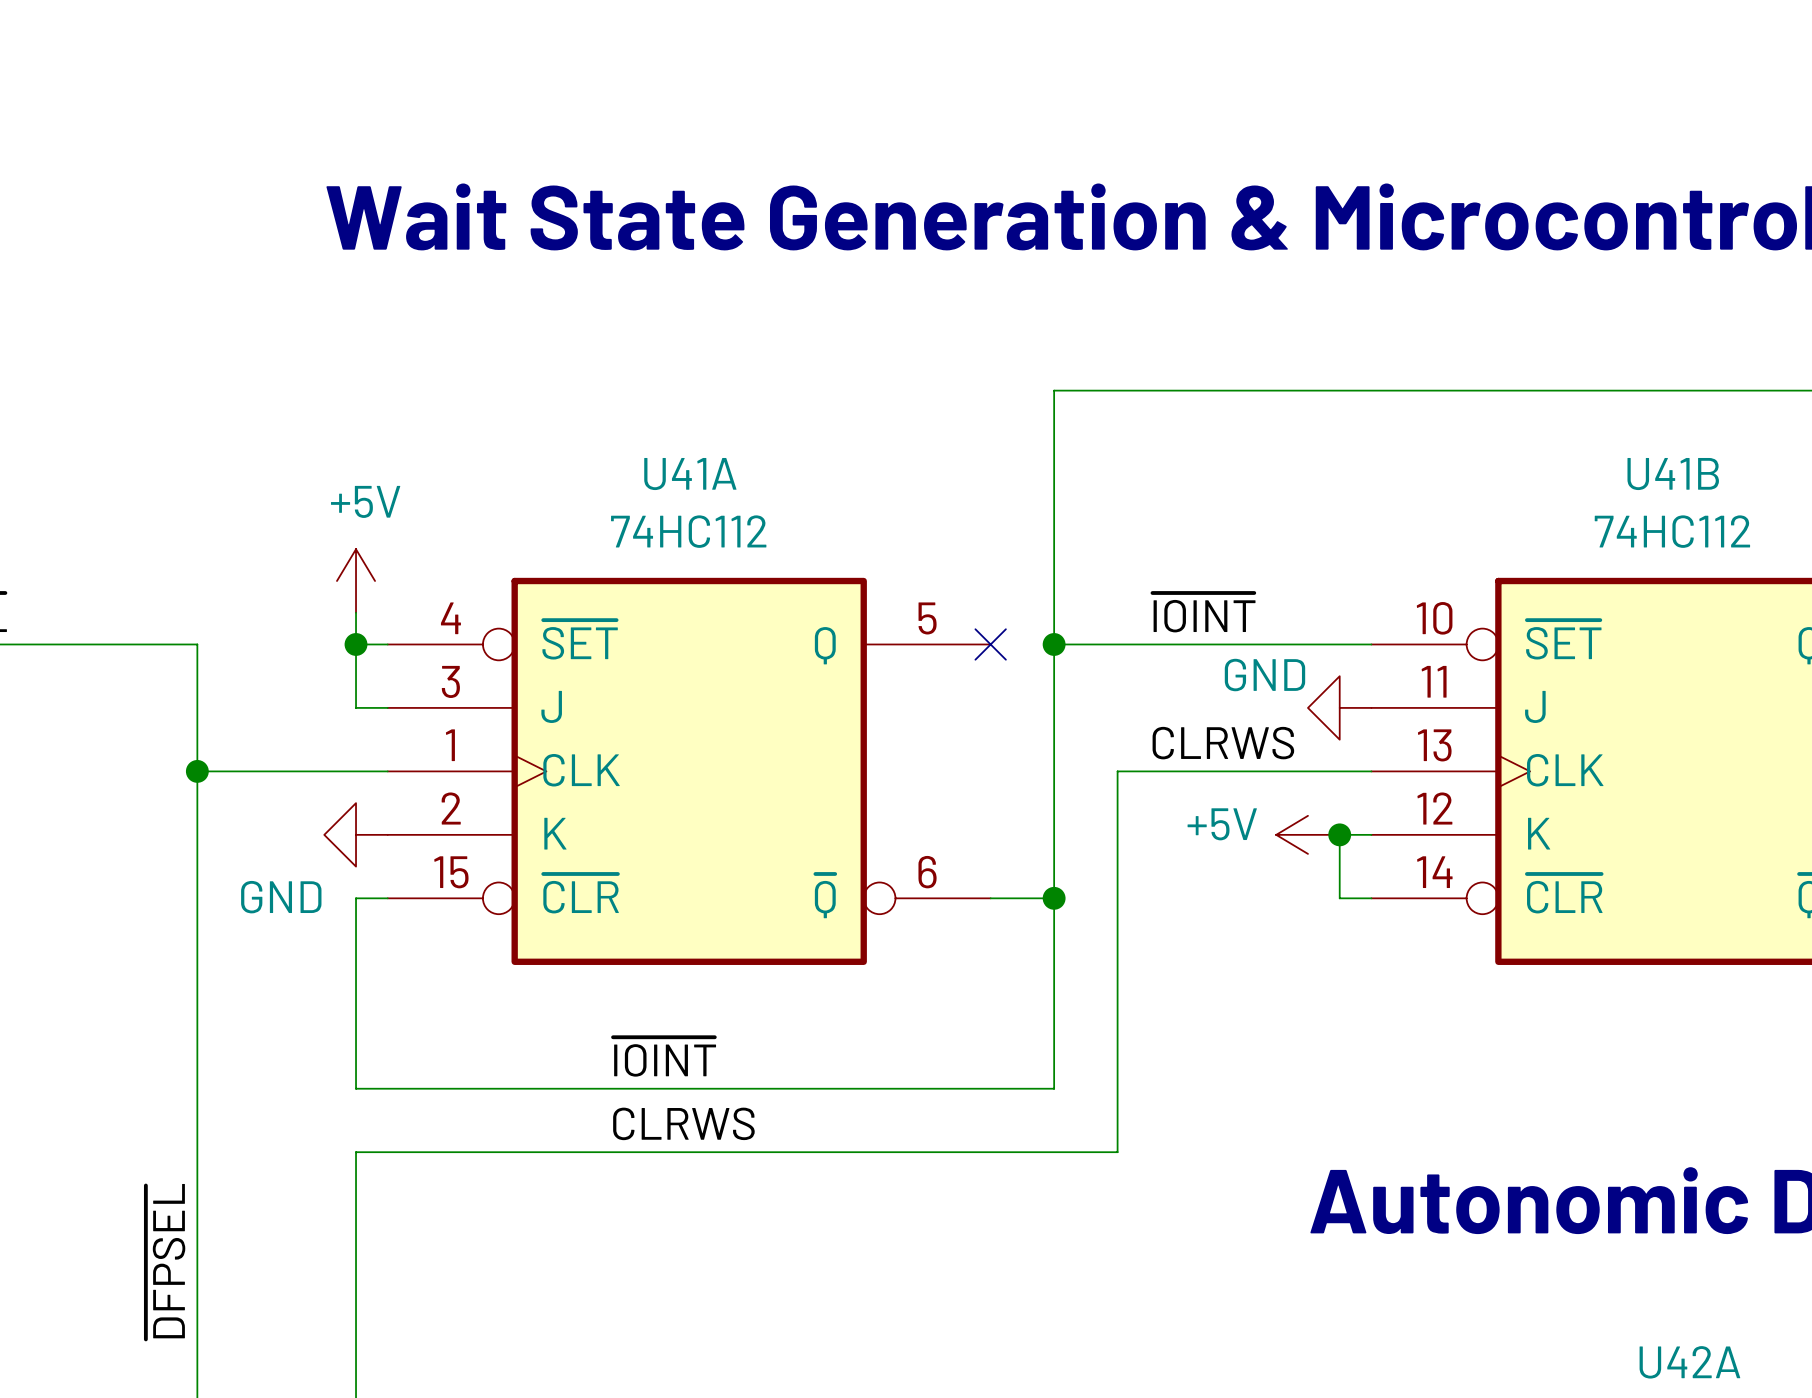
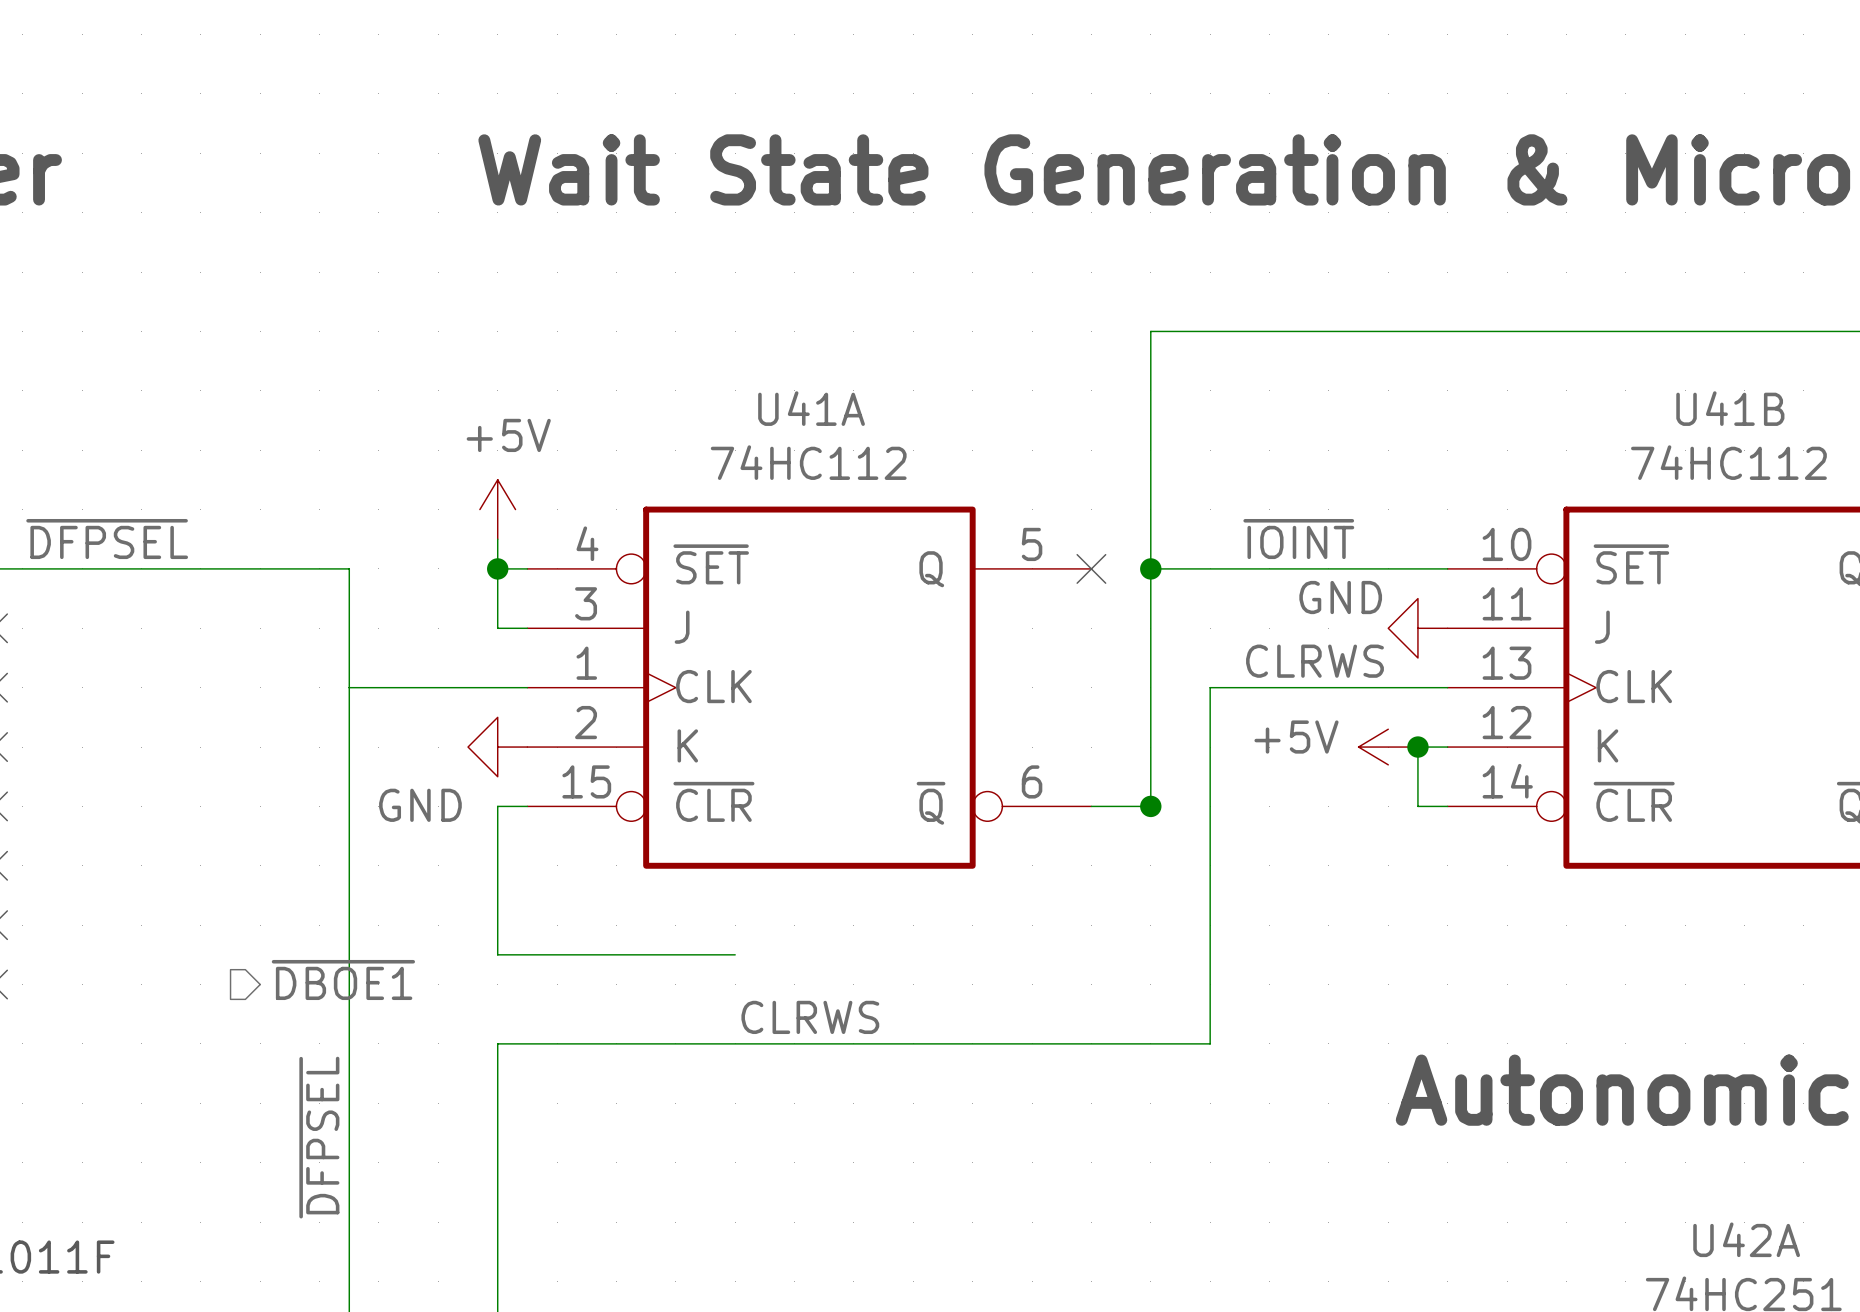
junction: (197, 771) -> none
wire: (1054, 898) (1054, 1088) (356, 1088) (356, 1056) -> (735, 954) (497, 954)
label: ~{IOINT} (664, 1056) -> none
hierarchical label: none -> ~{DBOE1} (343, 980)

